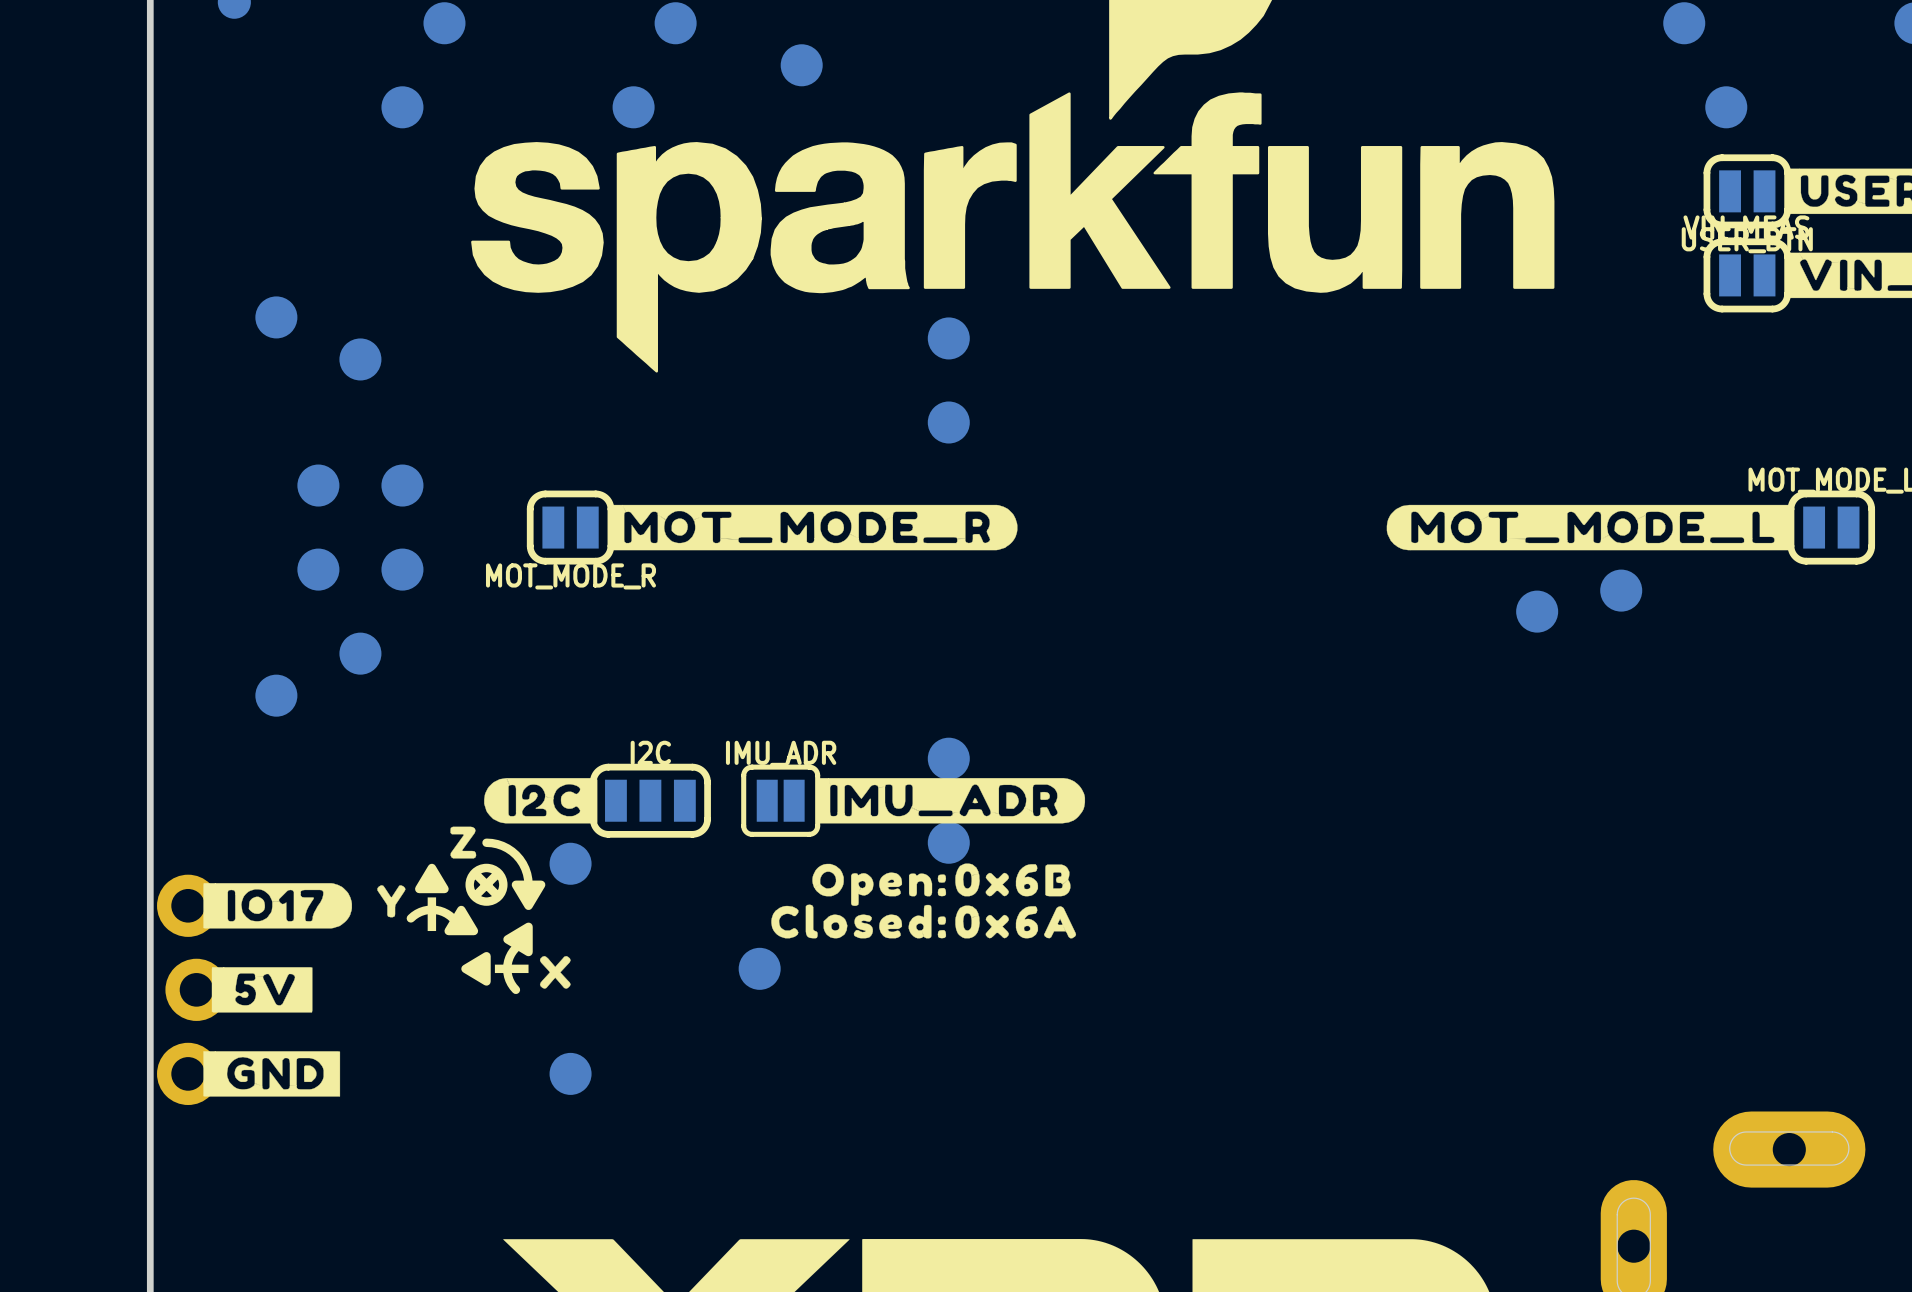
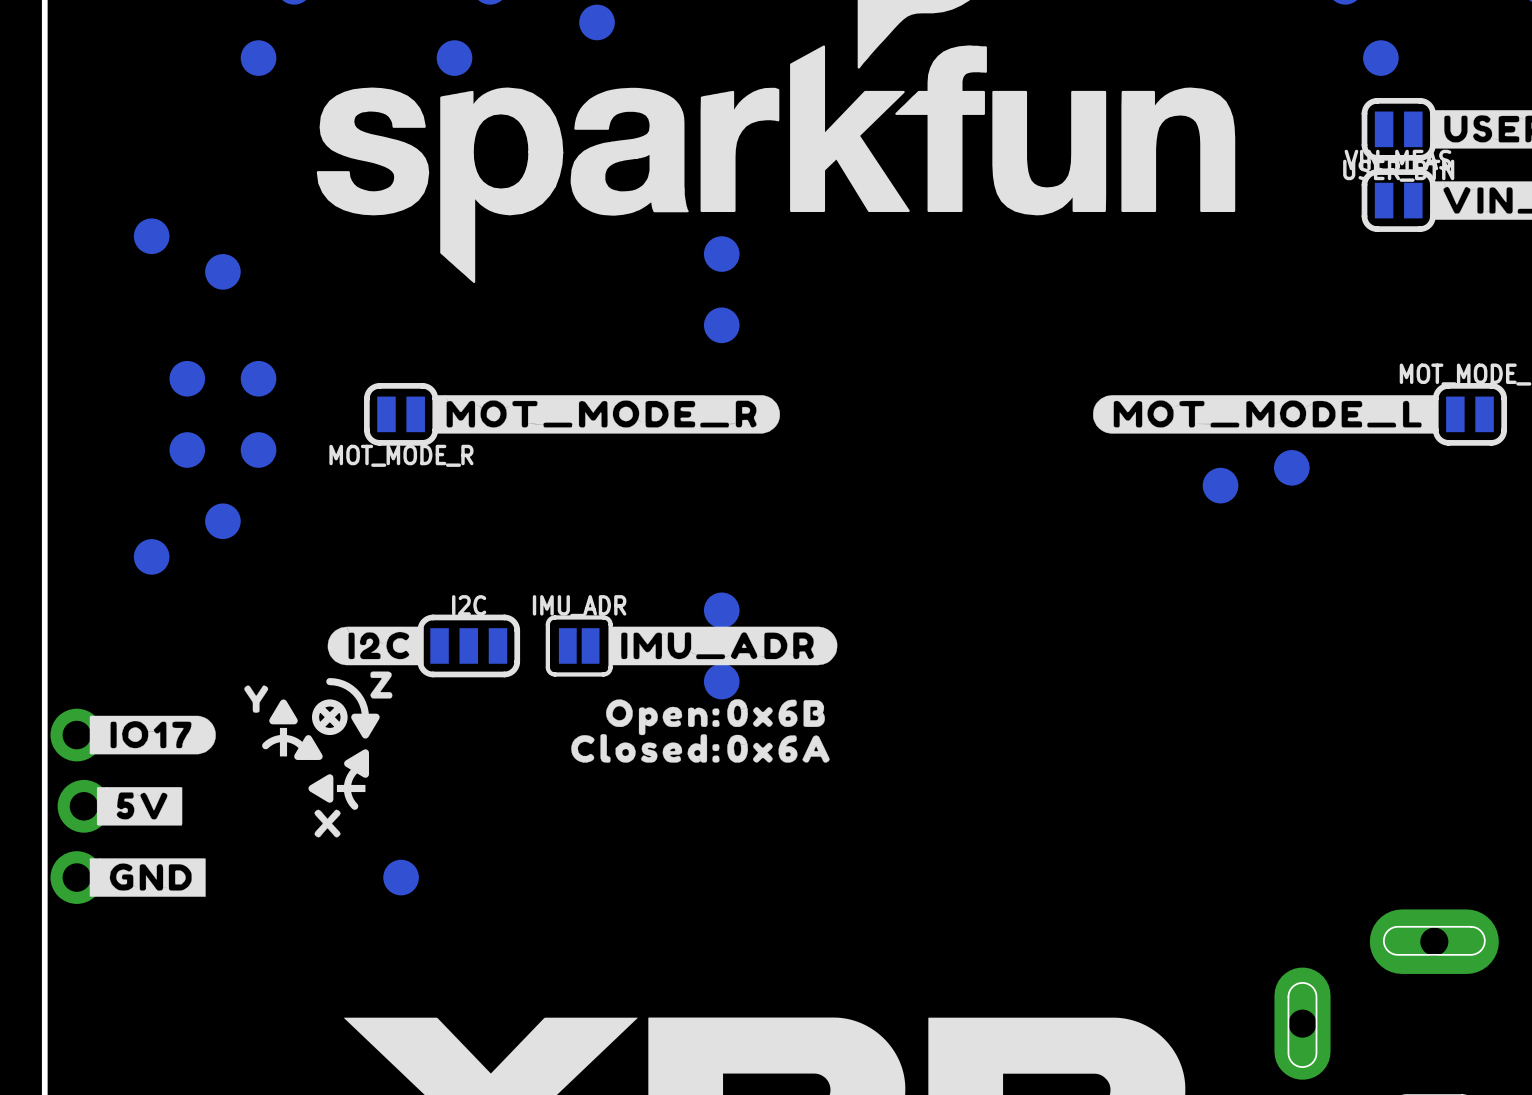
drawing position: (463, 842) -> (381, 685)
part: (570, 863) -> none
drawing position: (391, 901) -> (256, 699)
part: (759, 968) -> none
drawing position: (555, 972) -> (327, 823)

